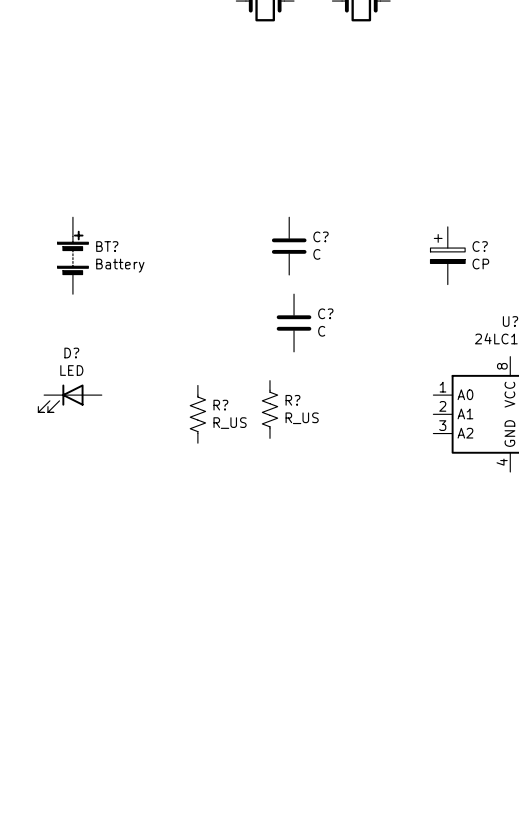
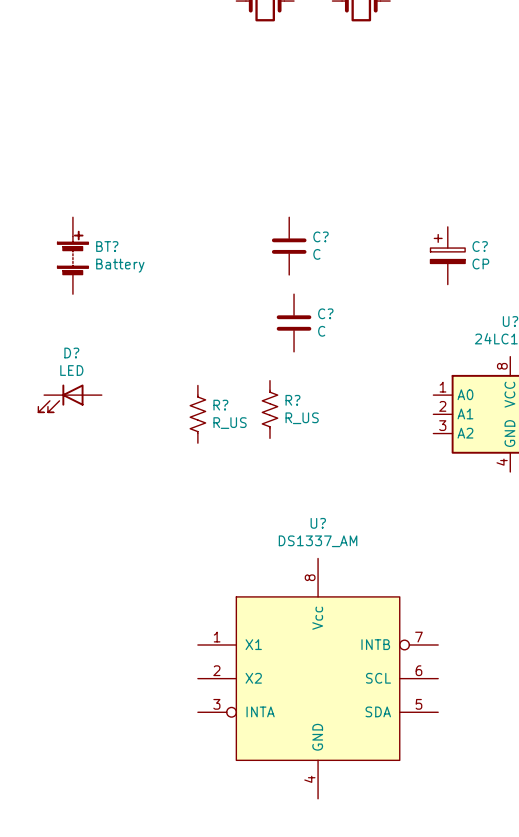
U?: none -> DS1337_AM (318, 678)

